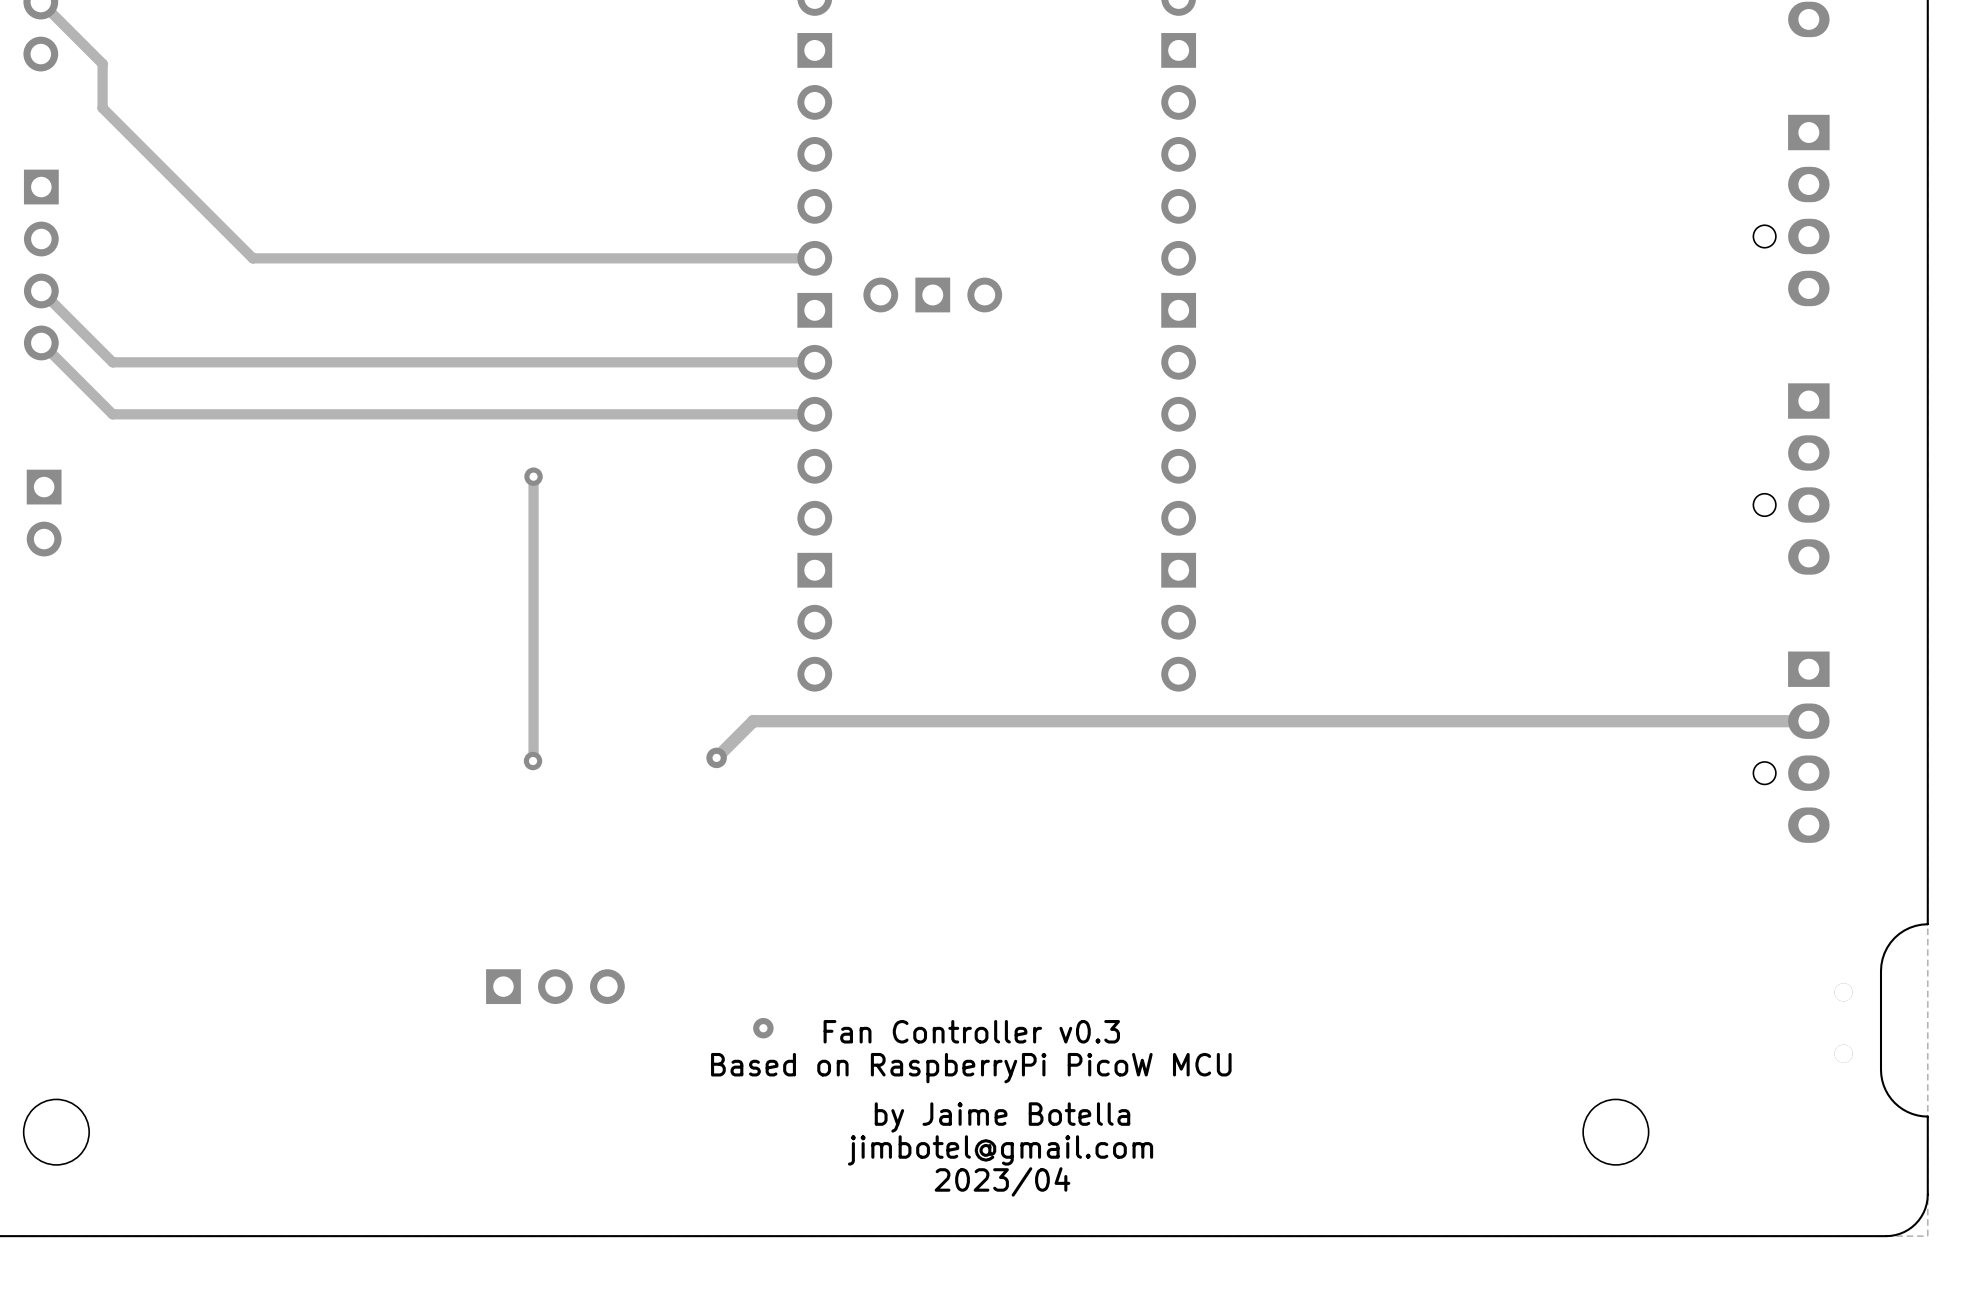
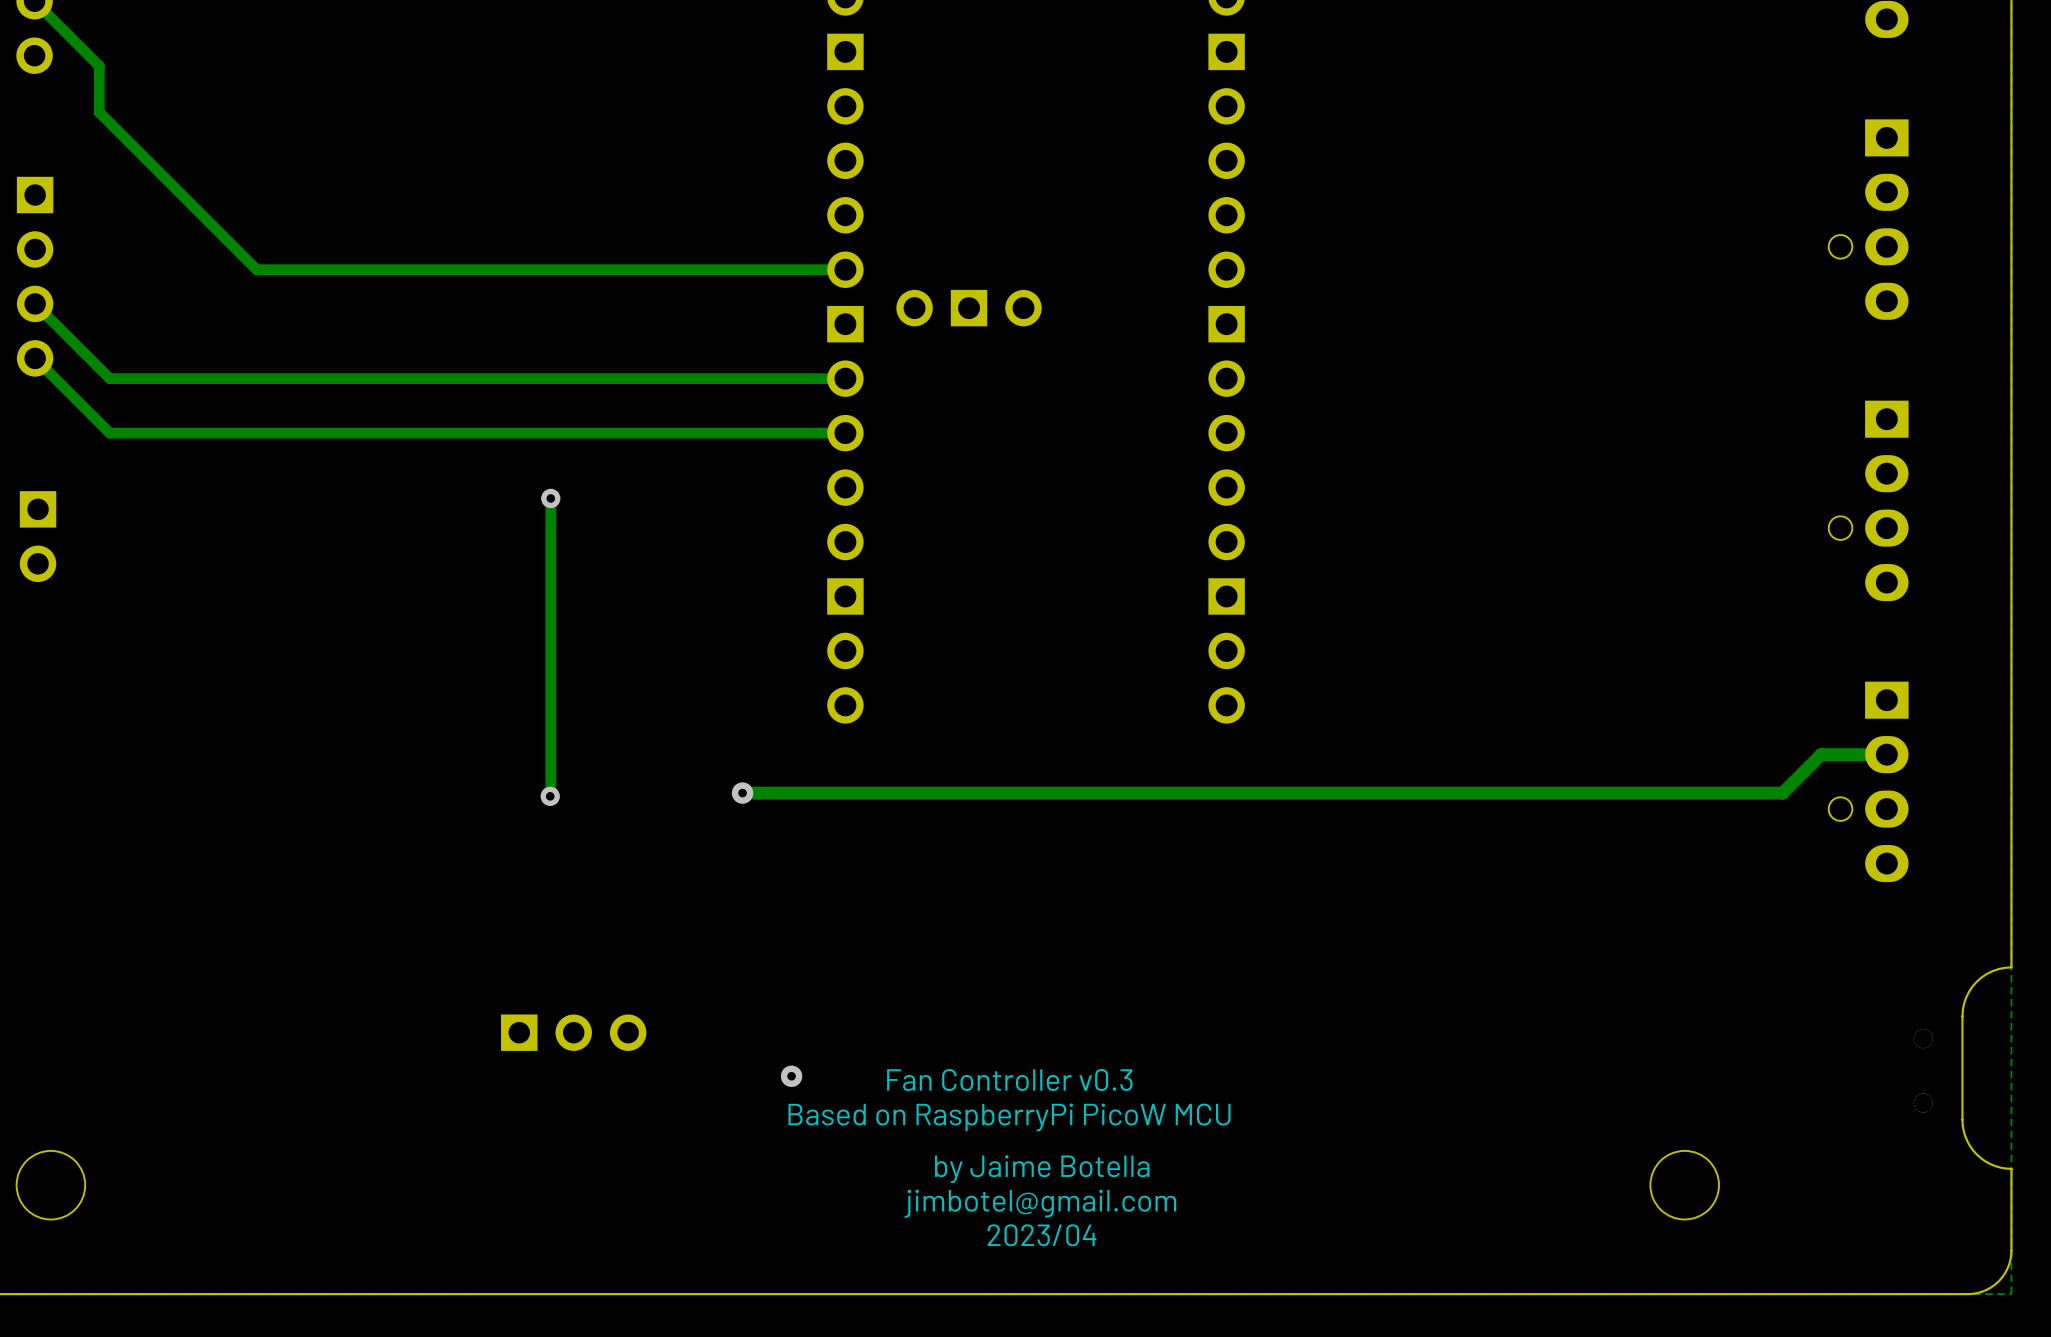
track: (1746, 721) (753, 721) (716, 757) -> (1821, 754) (1782, 793) (742, 793)

